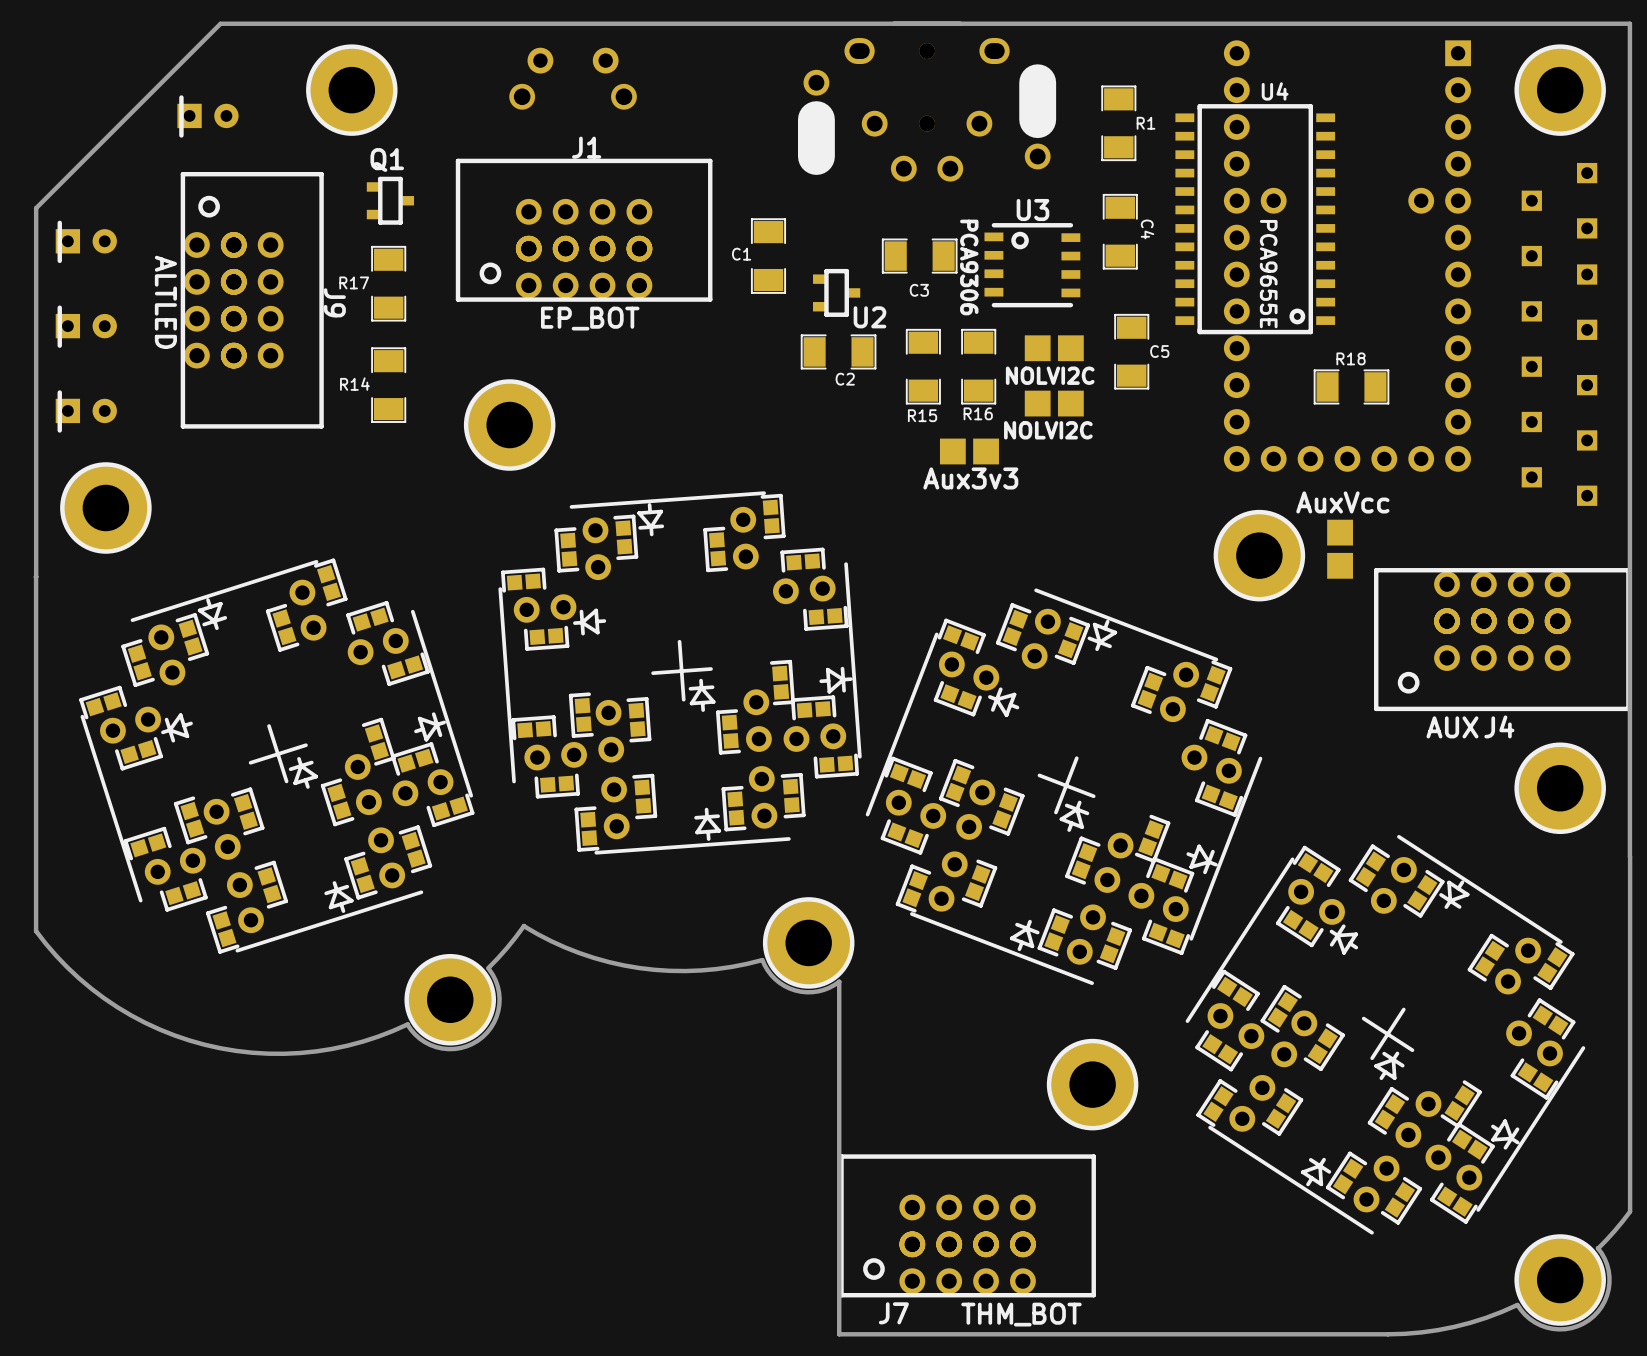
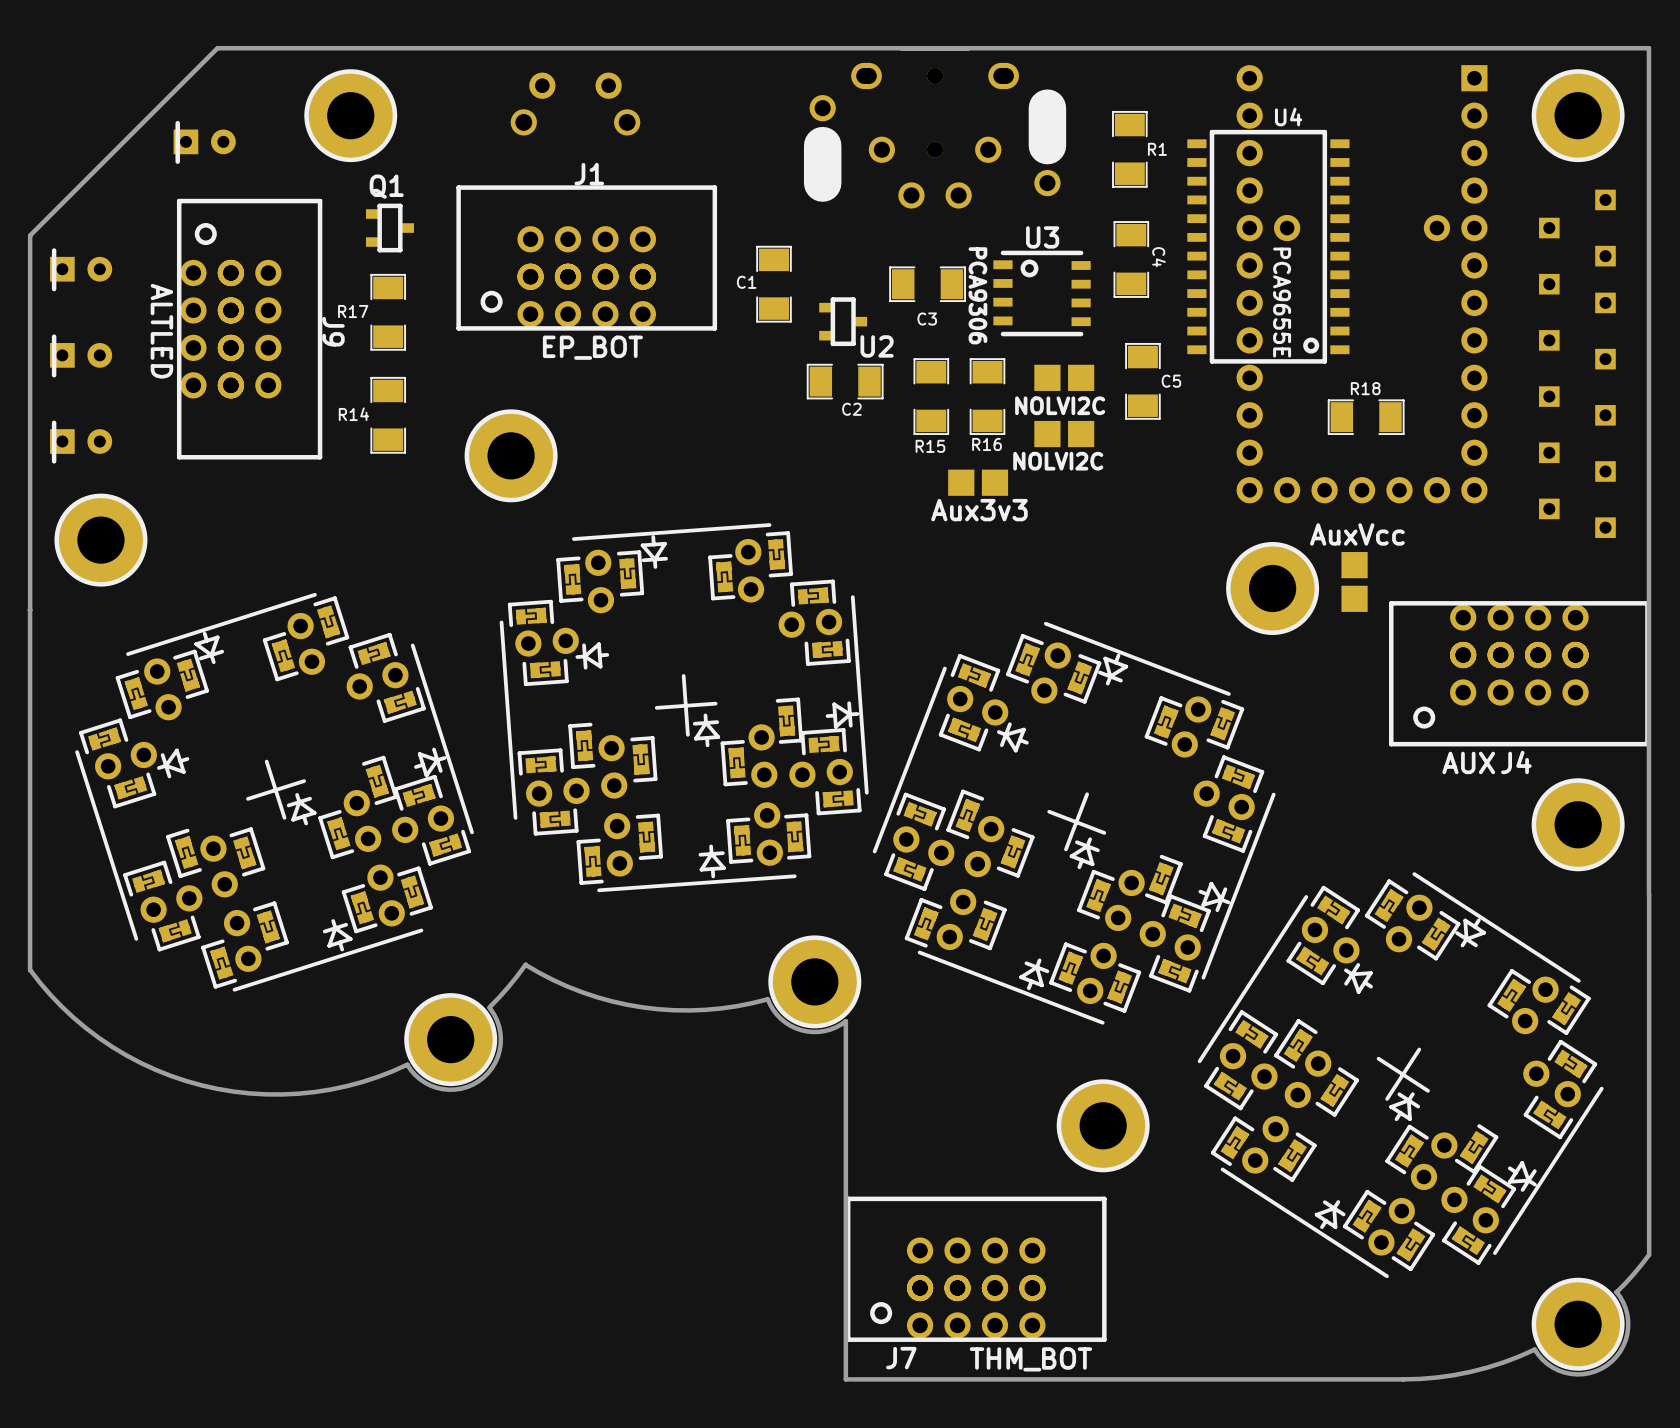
part footprint: [498, 491, 862, 855] -> [499, 523, 869, 893]
part footprint: [79, 558, 475, 954] -> [75, 592, 474, 992]
part footprint: [865, 588, 1263, 986] -> [872, 621, 1276, 1025]
part footprint: [1185, 834, 1586, 1235] -> [1197, 872, 1604, 1279]

